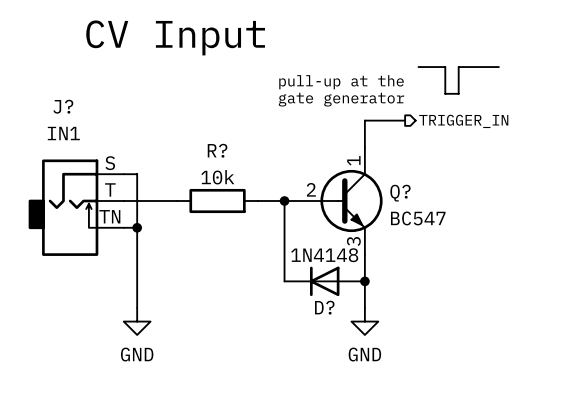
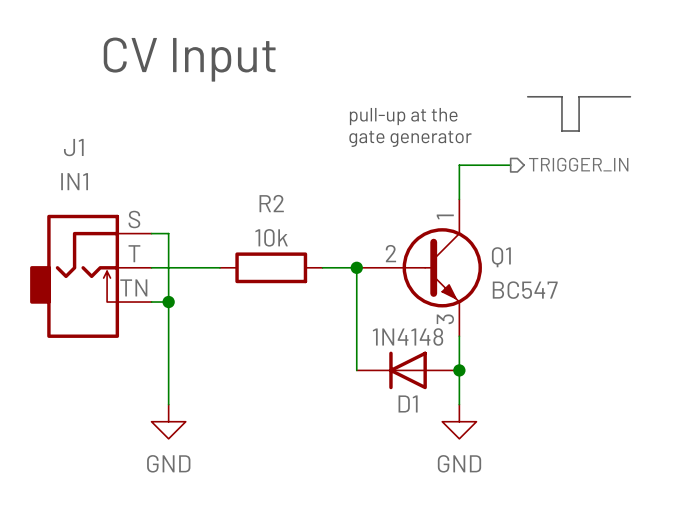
J? name: J? (63, 106) -> J1 (73, 147)
R? name: R? (217, 150) -> R2 (271, 203)
Q? name: Q? (400, 193) -> Q1 (501, 257)
D? name: D? (324, 307) -> D1 (408, 403)

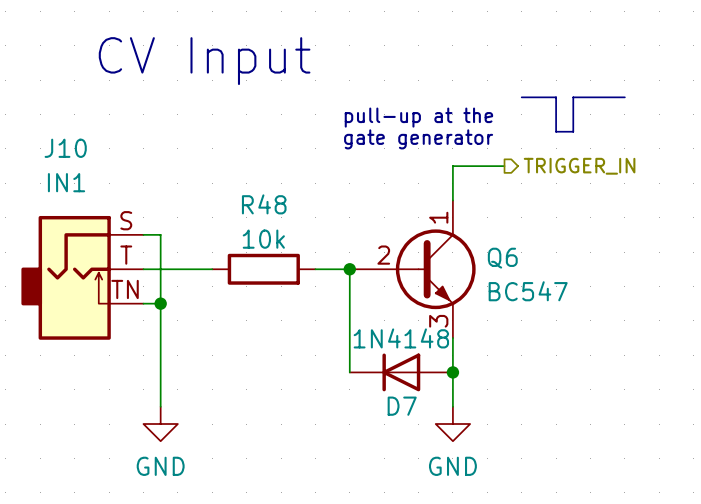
J1 name: J1 (73, 147) -> J10 (65, 148)
R2 name: R2 (271, 203) -> R48 (264, 204)
Q1 name: Q1 (501, 257) -> Q6 (502, 258)
D1 name: D1 (408, 403) -> D7 (402, 406)

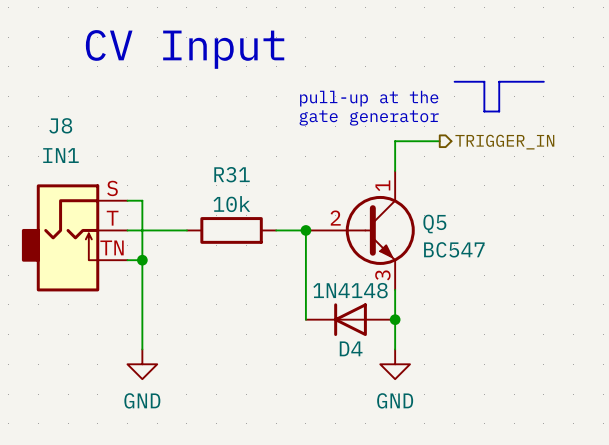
J10 name: J10 (65, 148) -> J8 (60, 125)
R48 name: R48 (264, 204) -> R31 (232, 174)
Q6 name: Q6 (502, 258) -> Q5 (434, 223)
D7 name: D7 (402, 406) -> D4 (351, 348)

